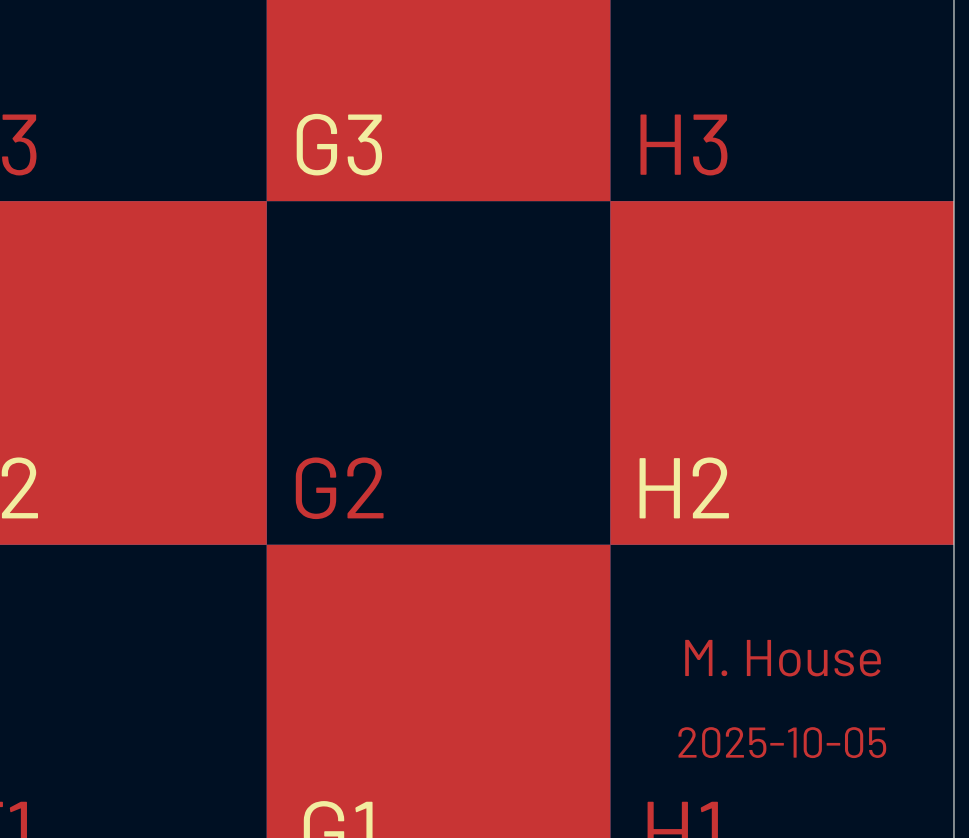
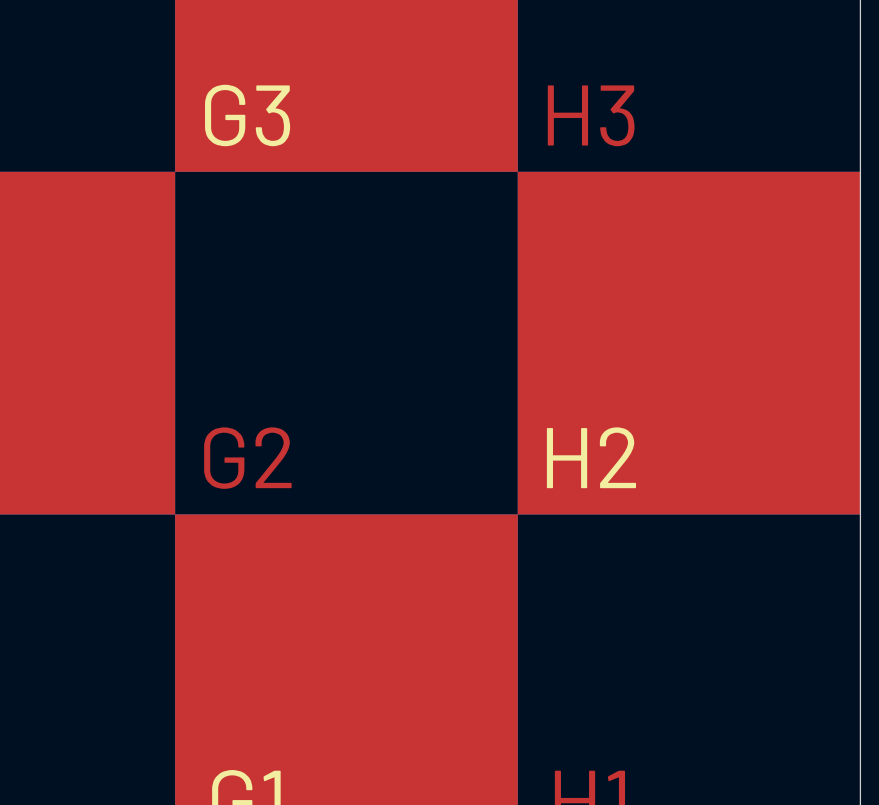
text: M. House (783, 658) -> none
text: 2025-10-05 (782, 742) -> none

